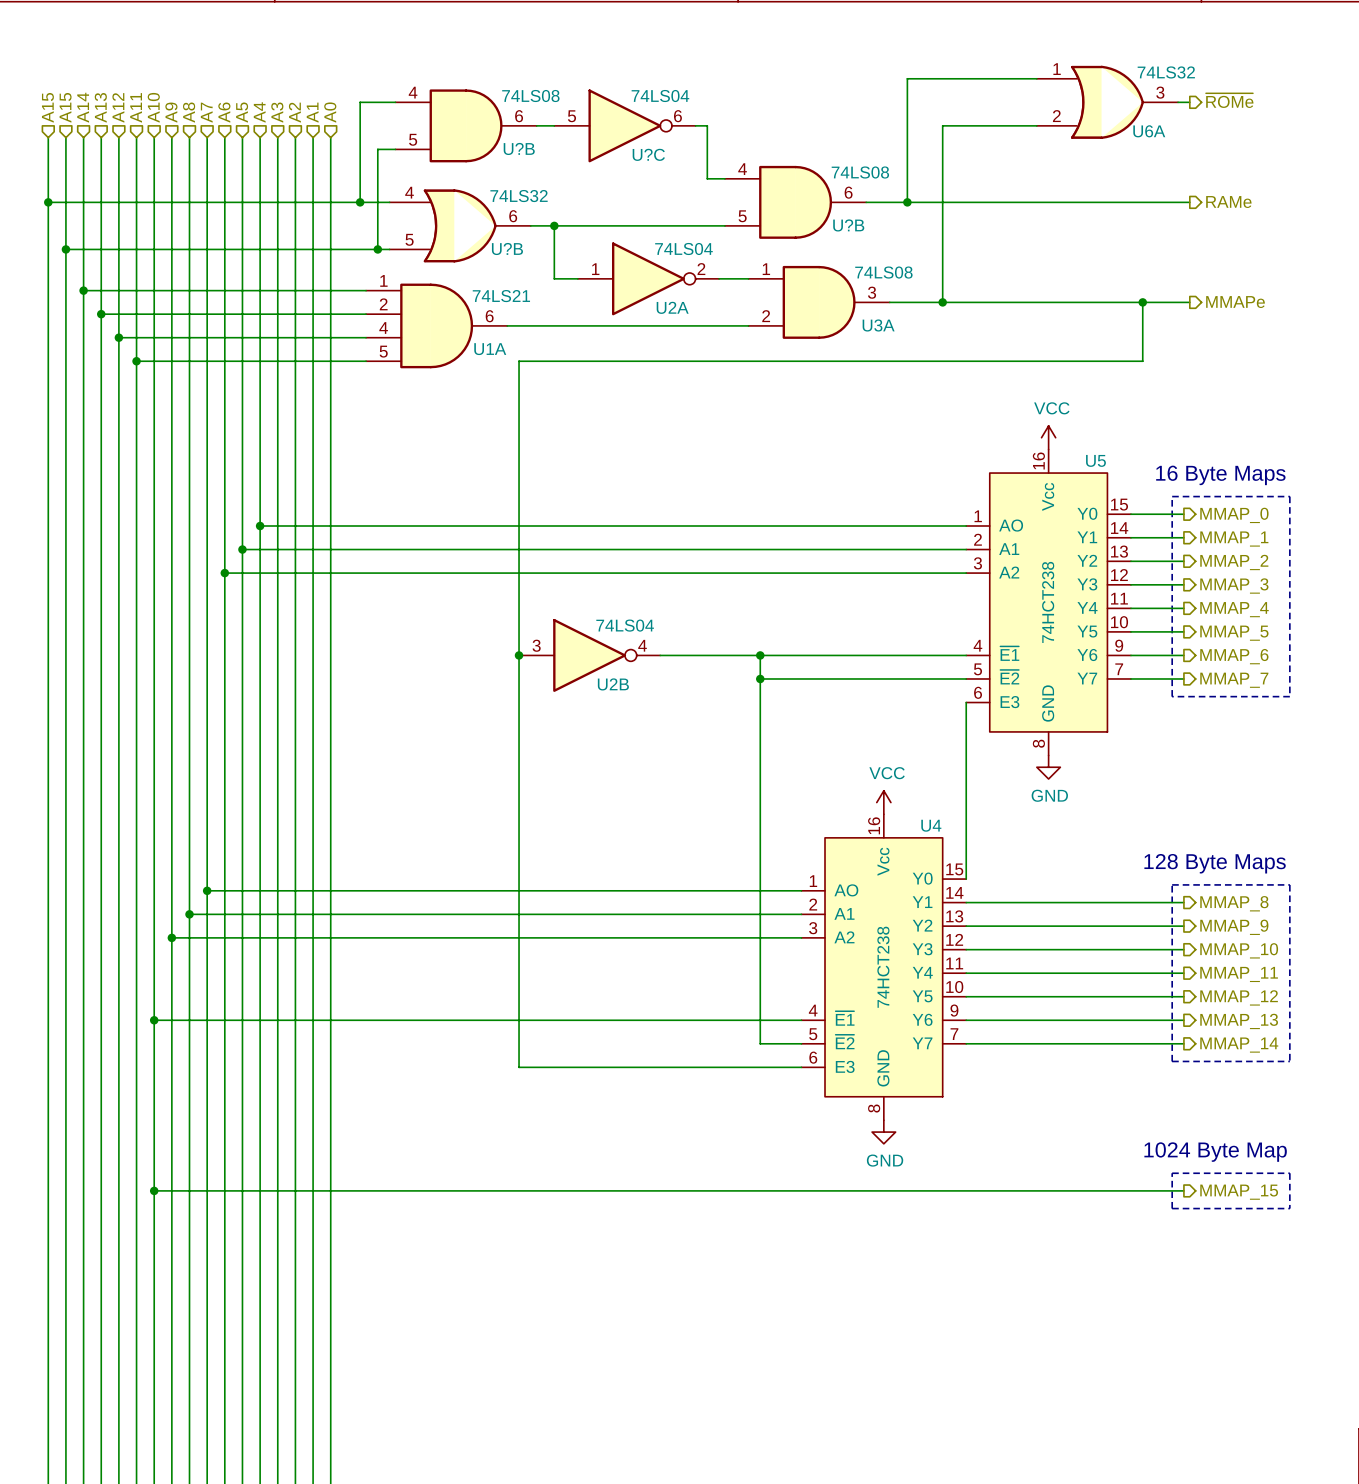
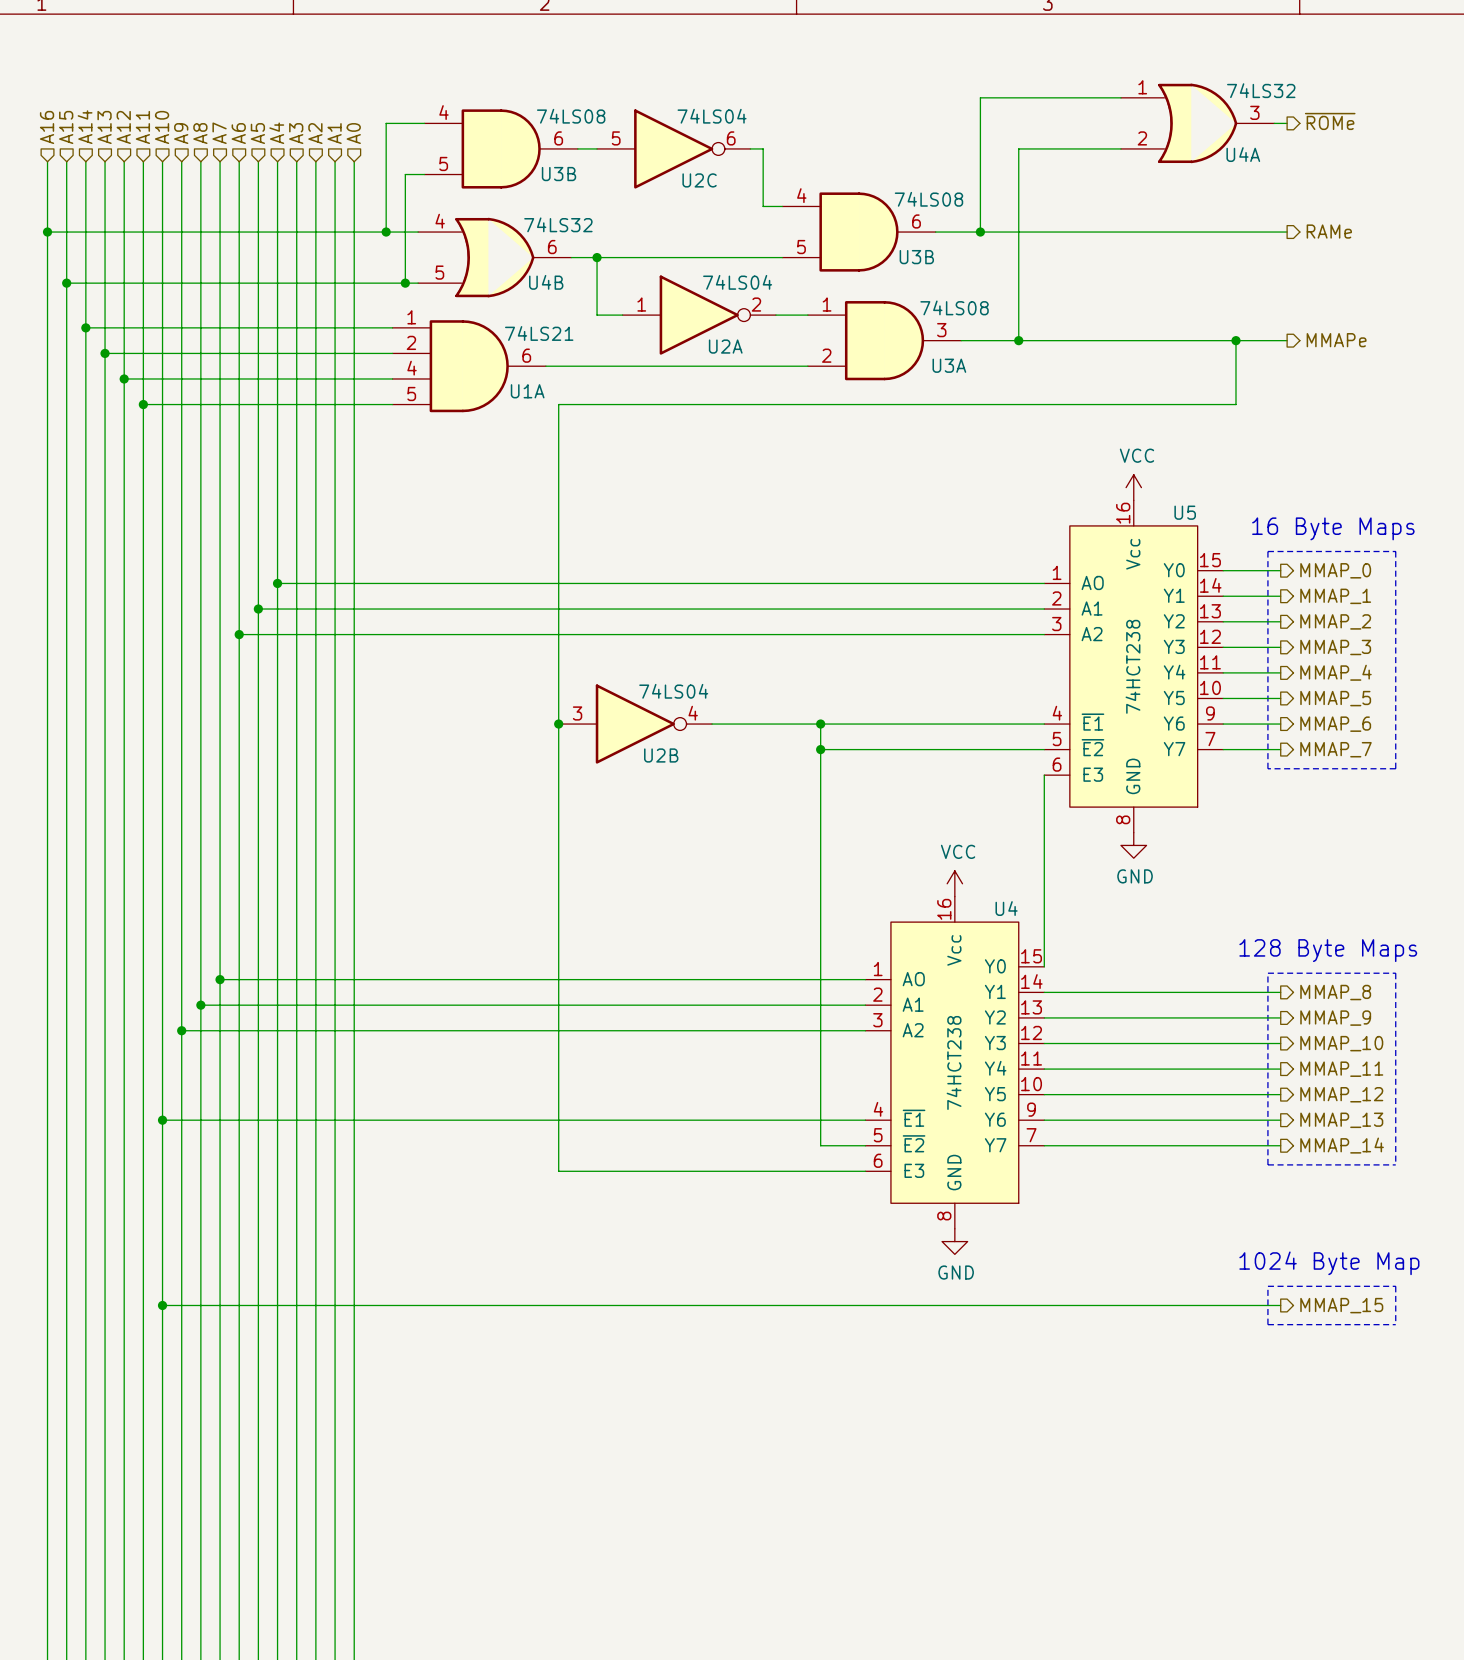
hierarchical label: A15 (47, 107) -> A16 (47, 127)
U6A name: U6A (1149, 131) -> U4A (1243, 154)
U?B name: U?B (519, 148) -> U3B (558, 174)
U?C name: U?C (648, 154) -> U2C (699, 180)
U?B name: U?B (848, 225) -> U3B (916, 257)
U?B name: U?B (507, 249) -> U4B (546, 282)

